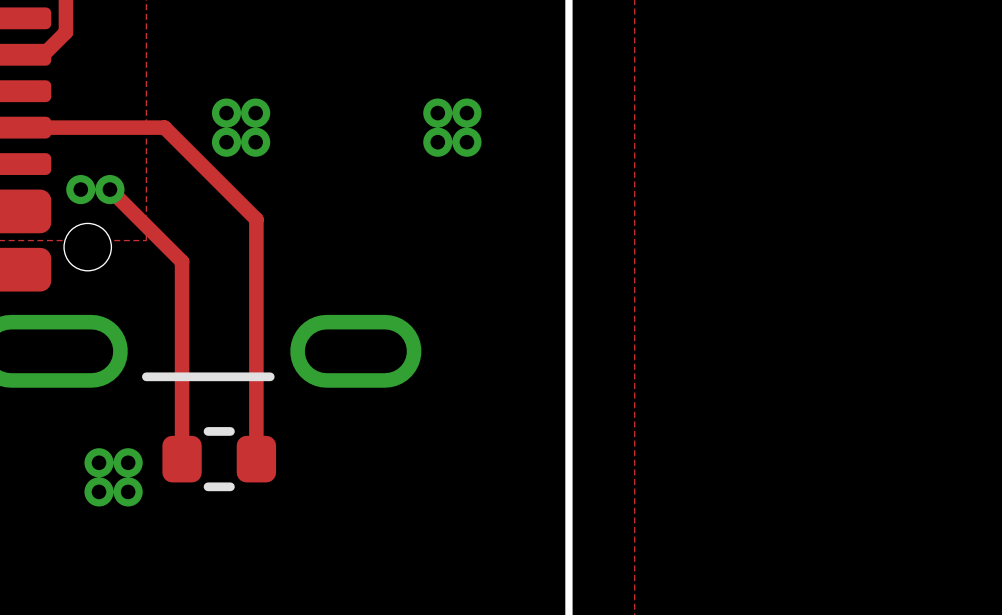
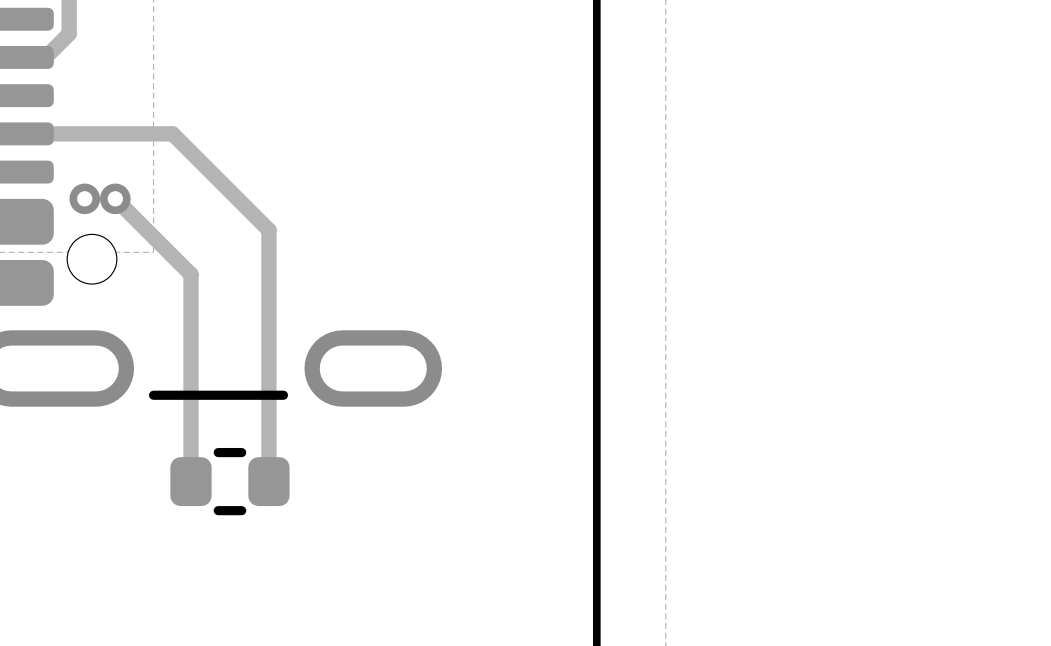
via: (226, 113) -> none
via: (255, 113) -> none
via: (437, 113) -> none
via: (466, 113) -> none
via: (226, 142) -> none
via: (255, 142) -> none
via: (437, 142) -> none
via: (466, 142) -> none
via: (99, 462) -> none
via: (128, 462) -> none
via: (99, 491) -> none
via: (128, 491) -> none

